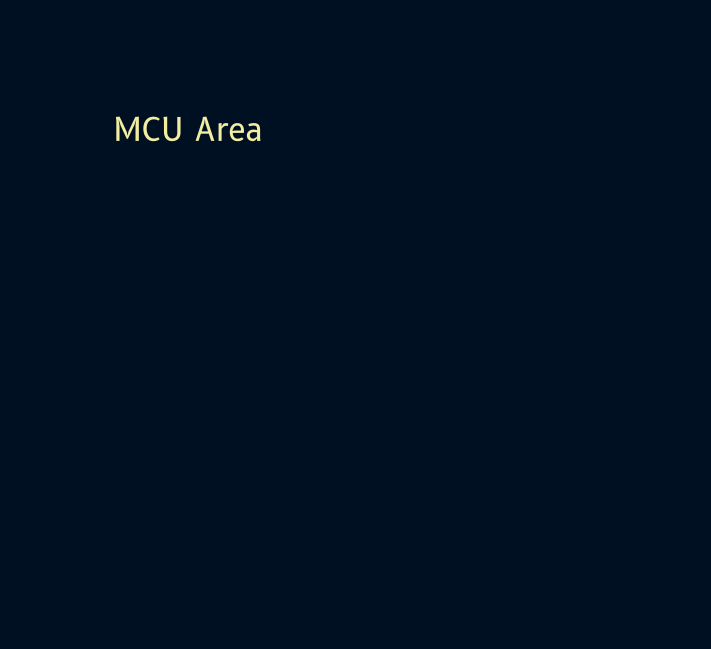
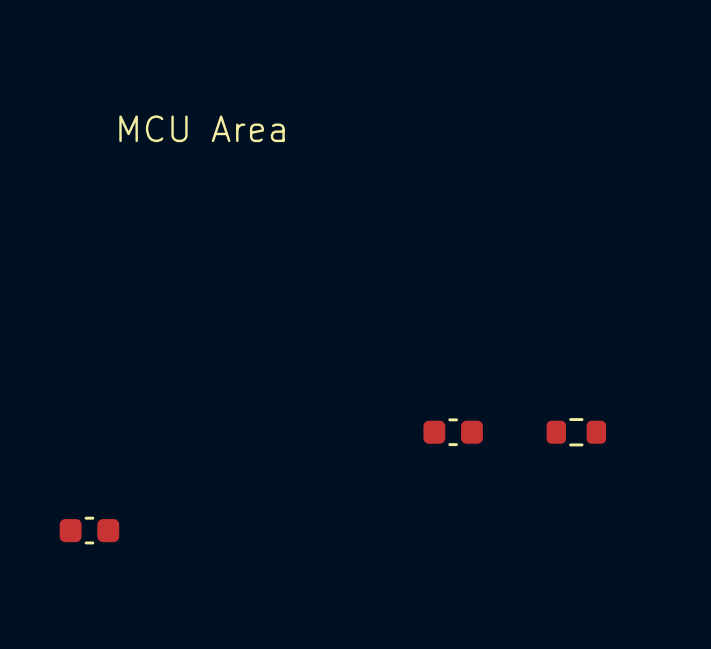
part: none -> (453, 432)
part: none -> (576, 432)
part: none -> (89, 530)

